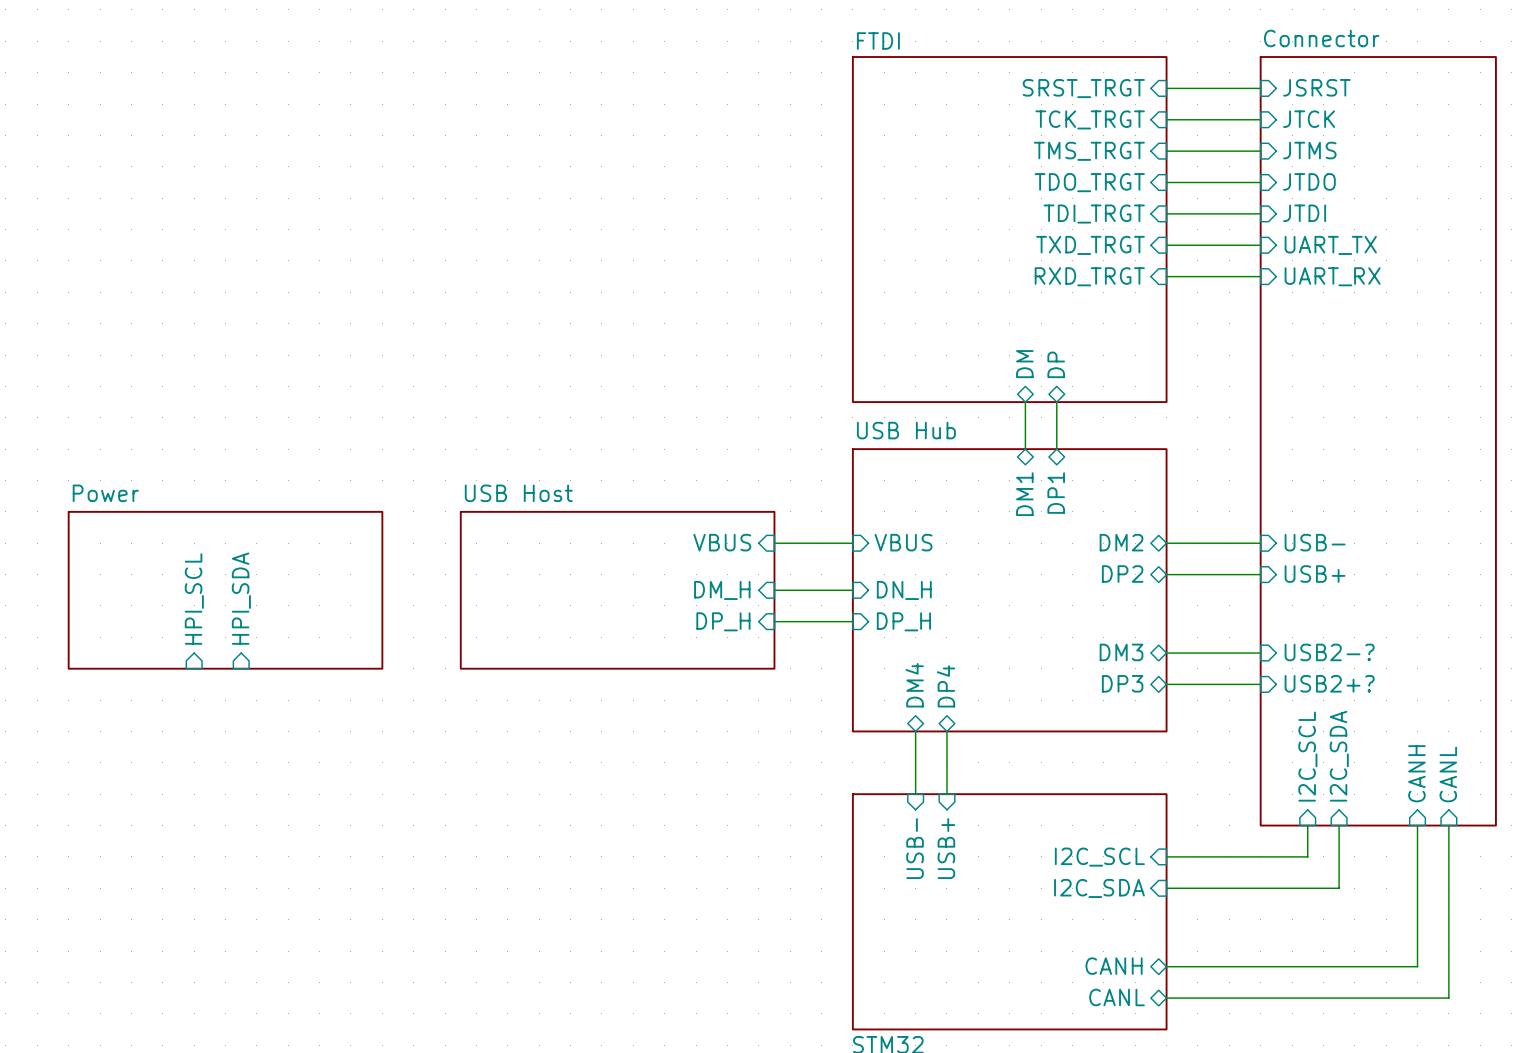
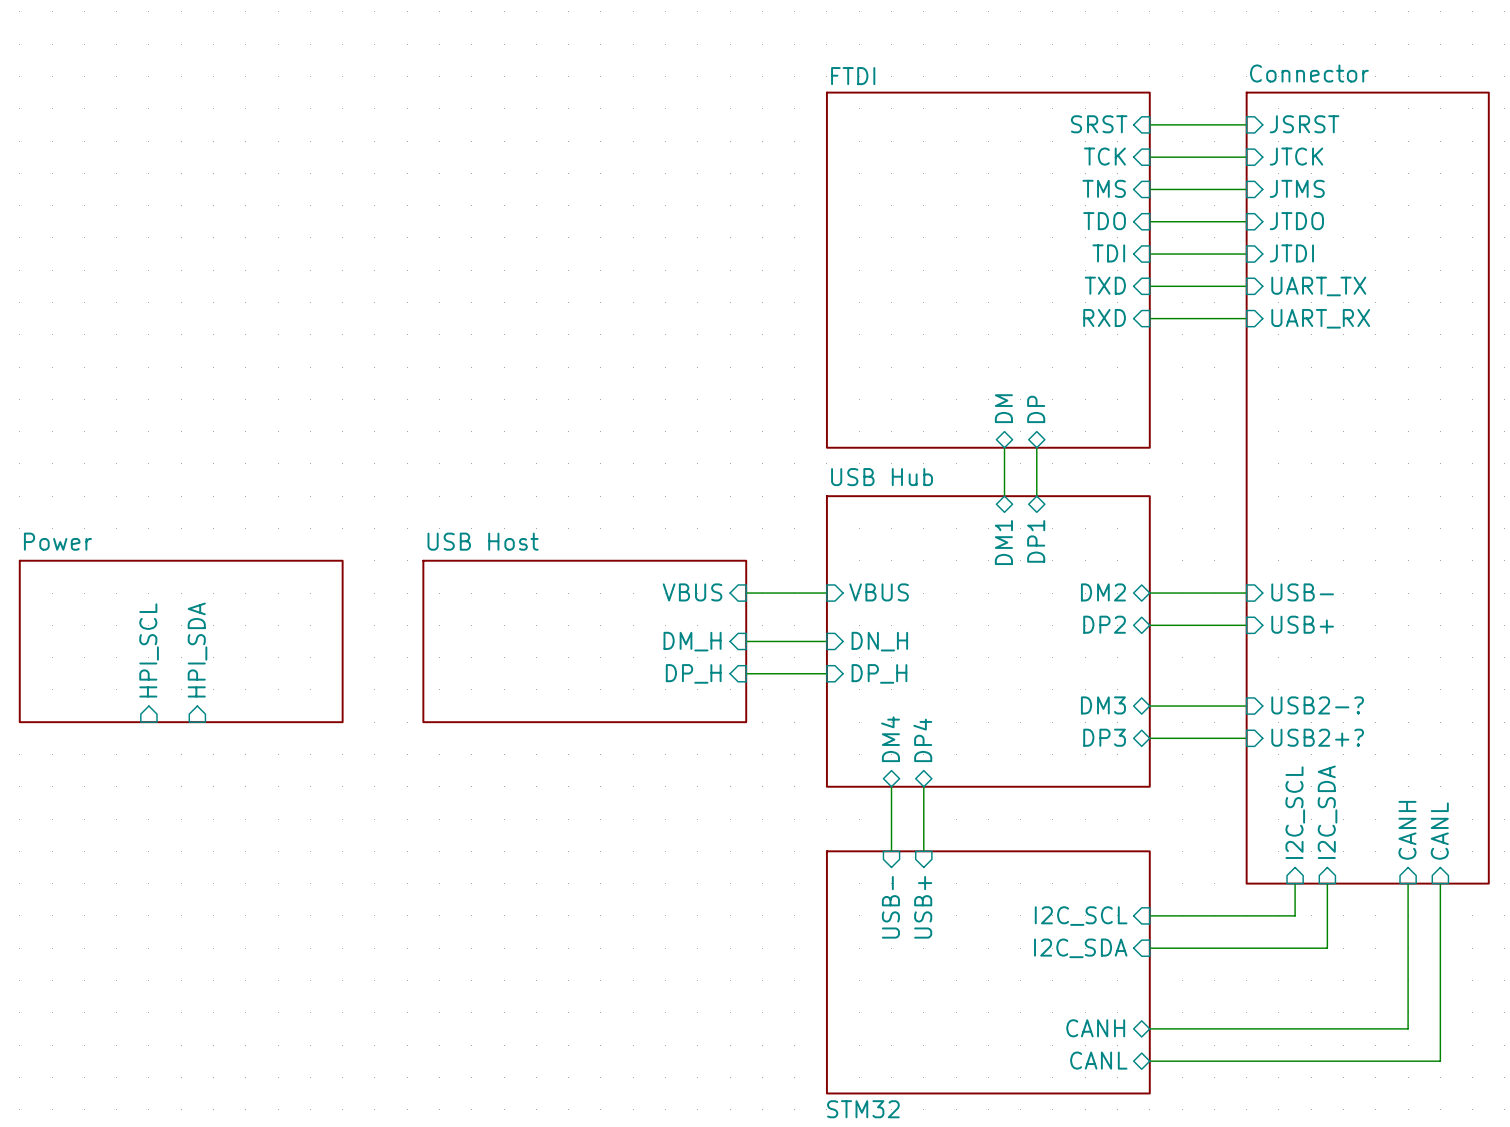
sheet pin: SRST_TRGT (1083, 88) -> SRST (1099, 124)
sheet pin: TCK_TRGT (1090, 119) -> TCK (1104, 156)
sheet pin: TMS_TRGT (1089, 151) -> TMS (1104, 188)
sheet pin: TDO_TRGT (1089, 182) -> TDO (1104, 221)
sheet pin: TDI_TRGT (1094, 214) -> TDI (1108, 253)
sheet pin: TXD_TRGT (1090, 245) -> TXD (1105, 285)
sheet pin: RXD_TRGT (1089, 276) -> RXD (1104, 317)

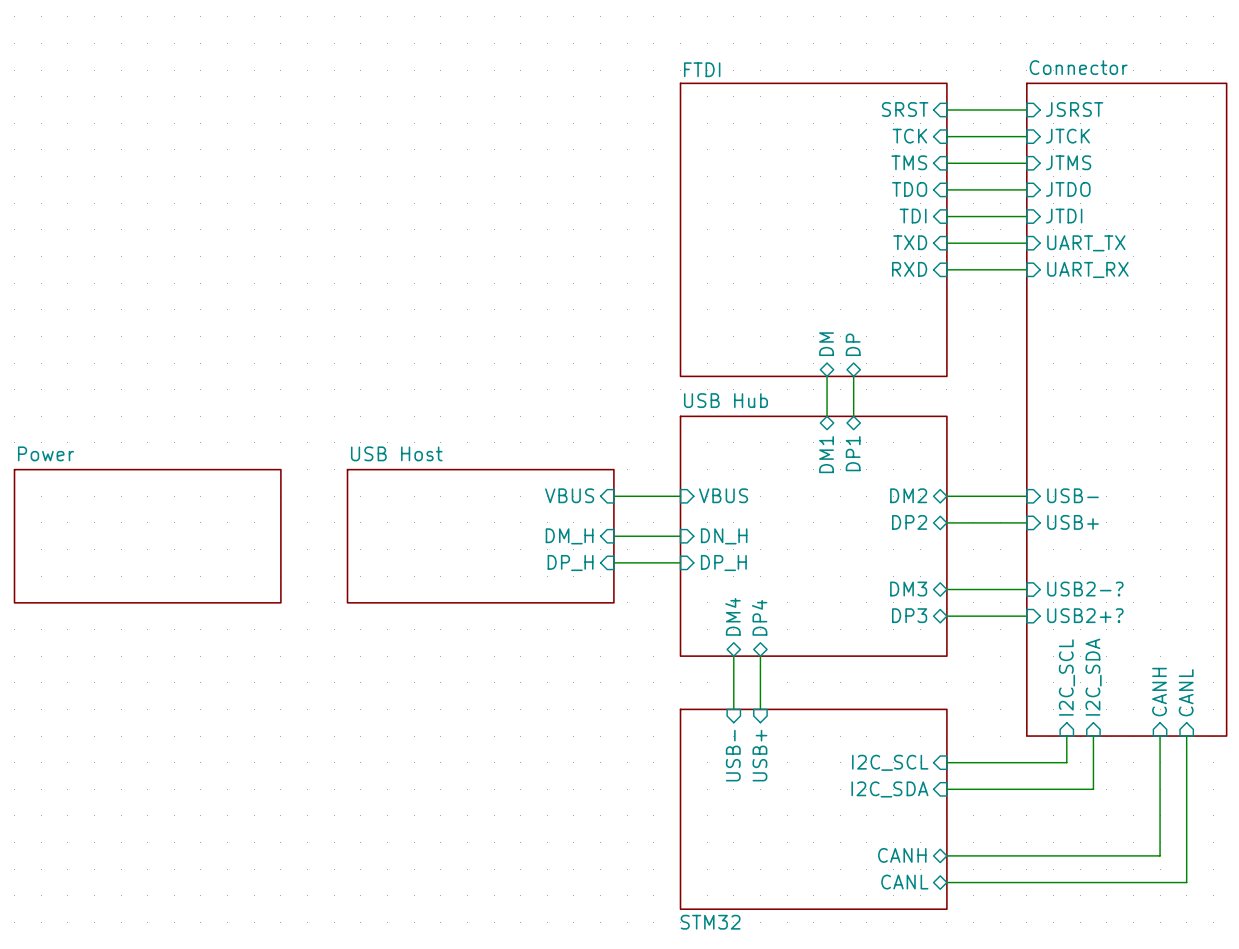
sheet pin: HPI_SCL (149, 650) -> none
sheet pin: HPI_SDA (197, 650) -> none

